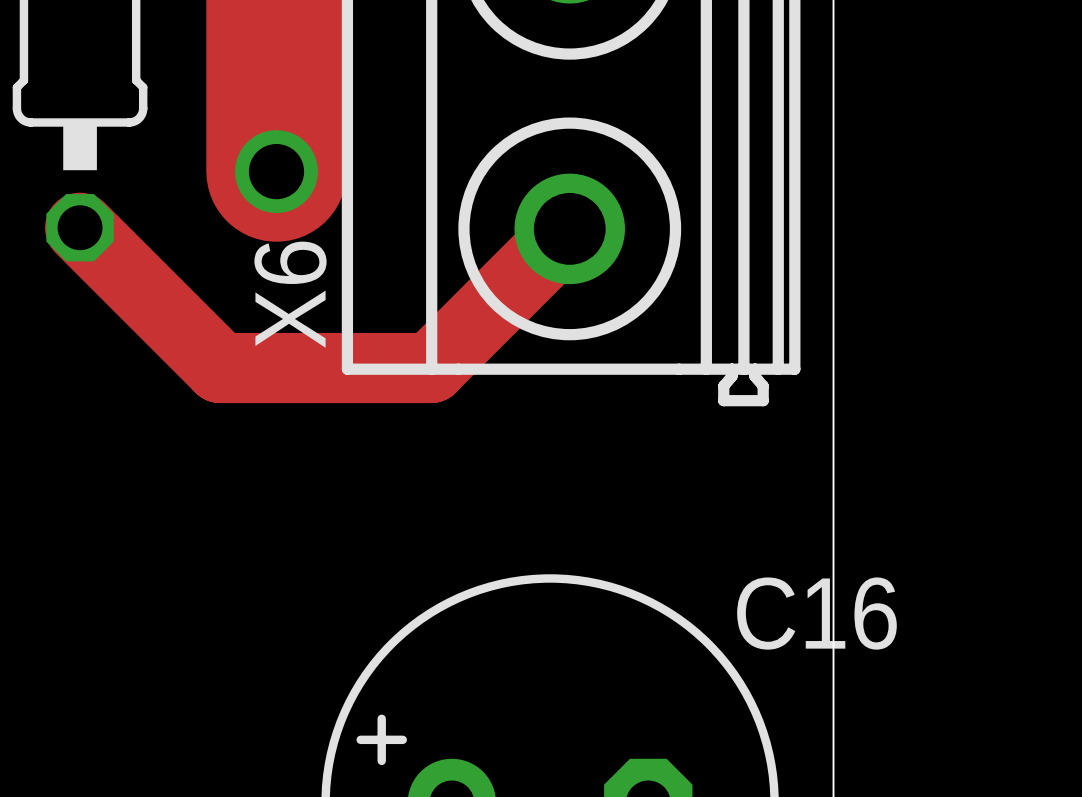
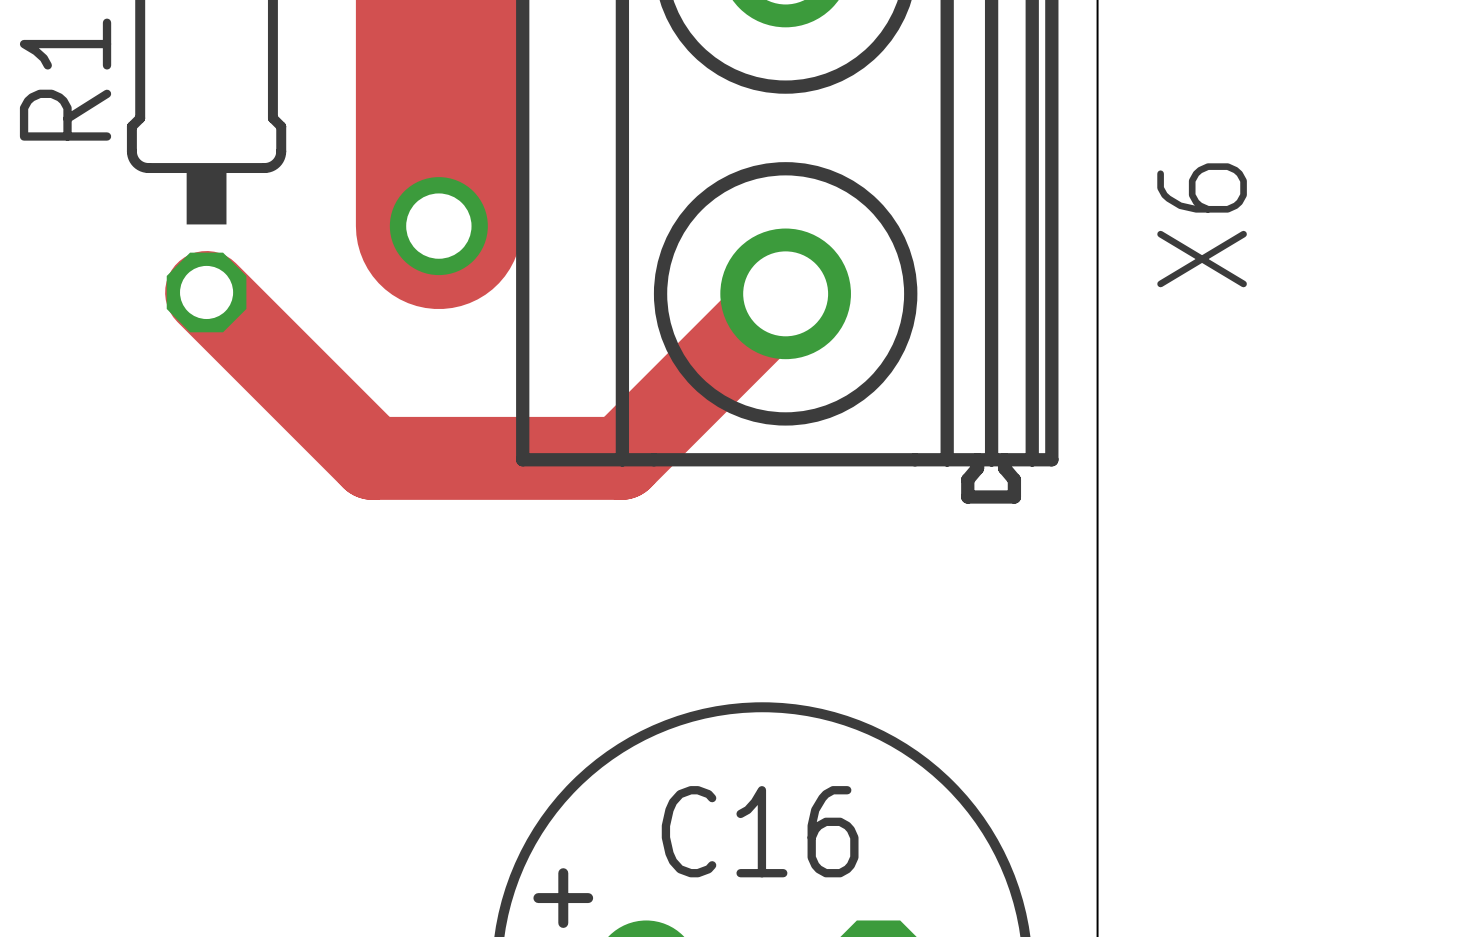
X6 name position: X6 (290, 294) -> X6 (1202, 225)
C16 name position: C16 (816, 613) -> C16 (760, 831)

